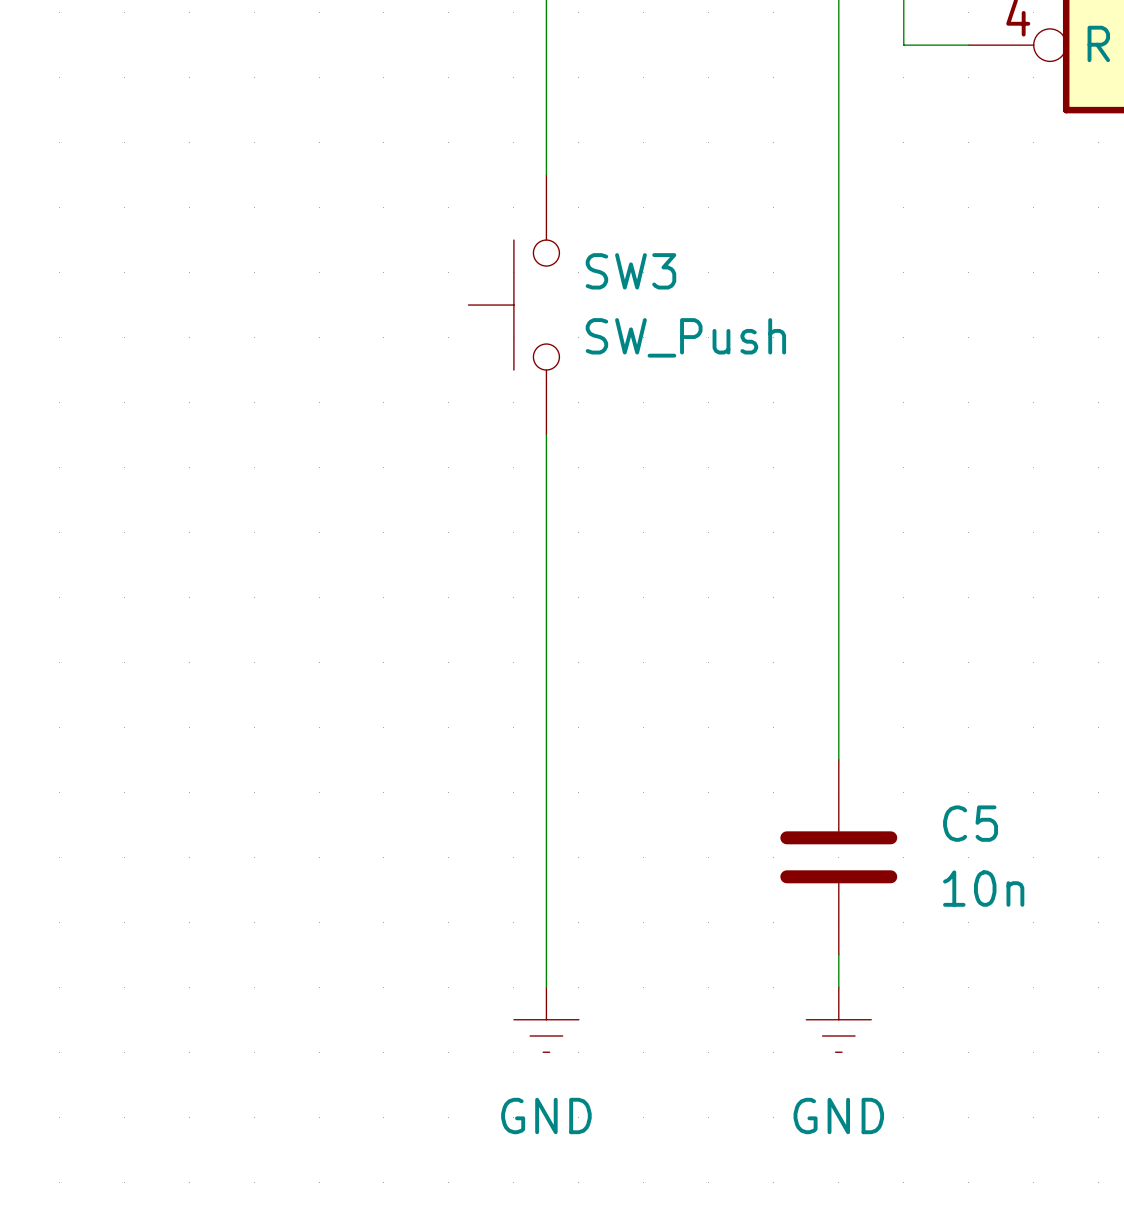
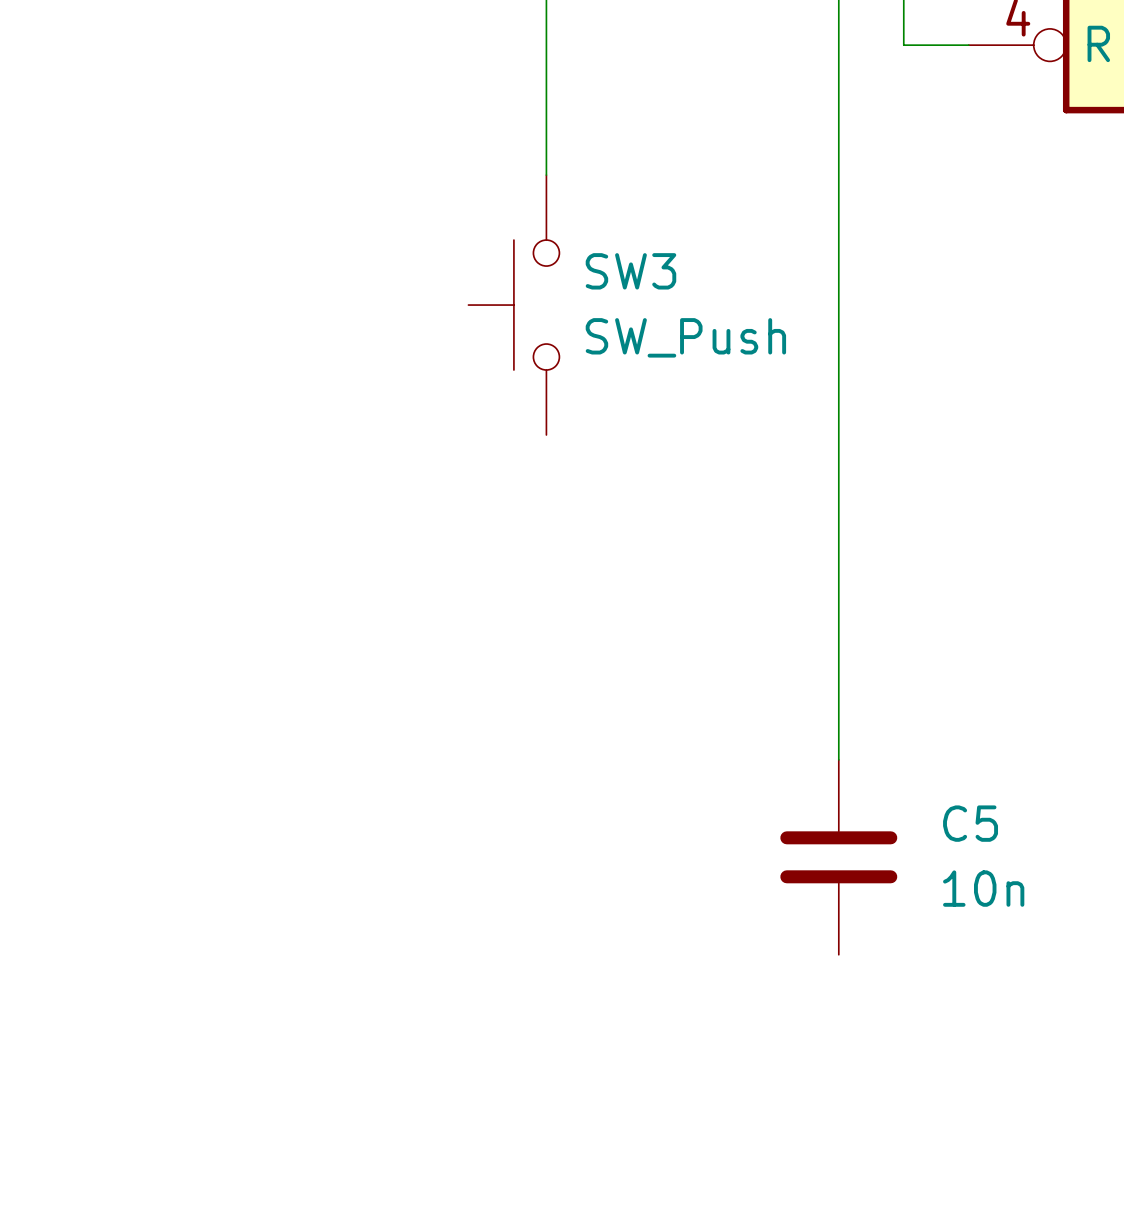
wire: (546, 434) (546, 987) -> none
wire: (838, 954) (838, 987) -> none
power symbol: GND (546, 1019) -> none
power symbol: GND (838, 1019) -> none

